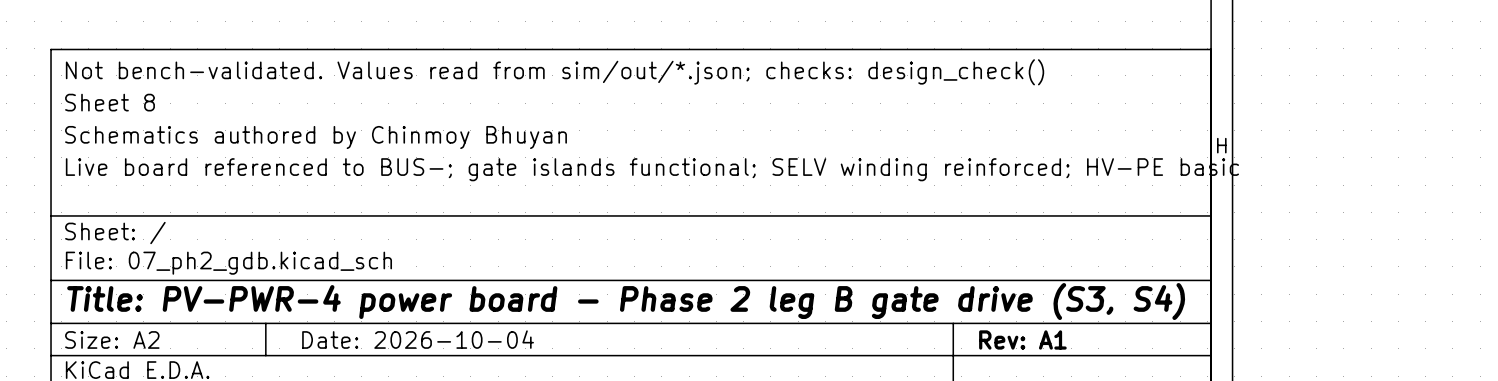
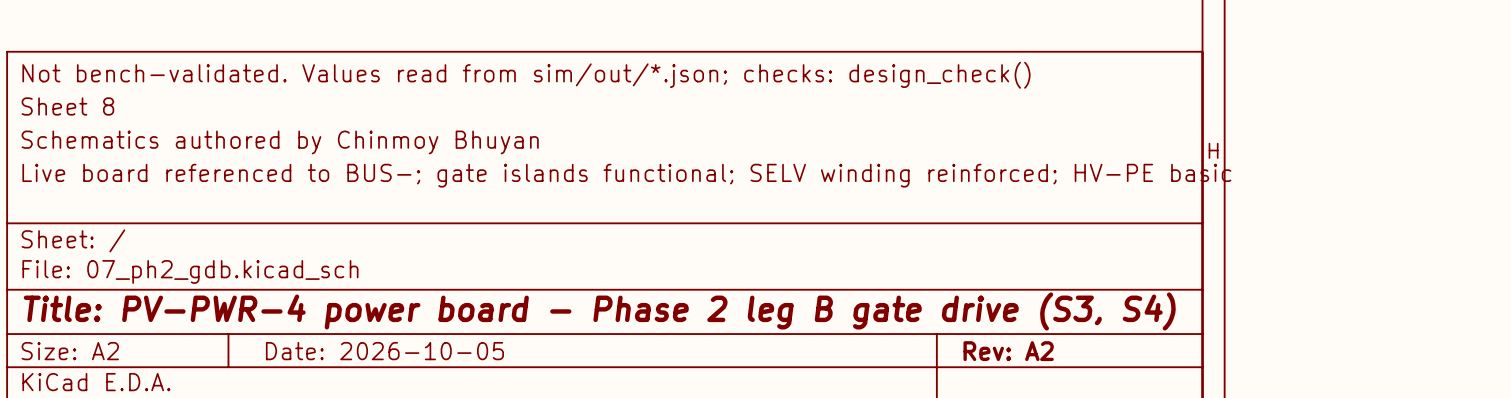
title block: Date: 2026-10-04 (418, 339) -> Date: 2026-10-05 (384, 351)
title block: Rev: A1 (1022, 339) -> Rev: A2 (1008, 351)

